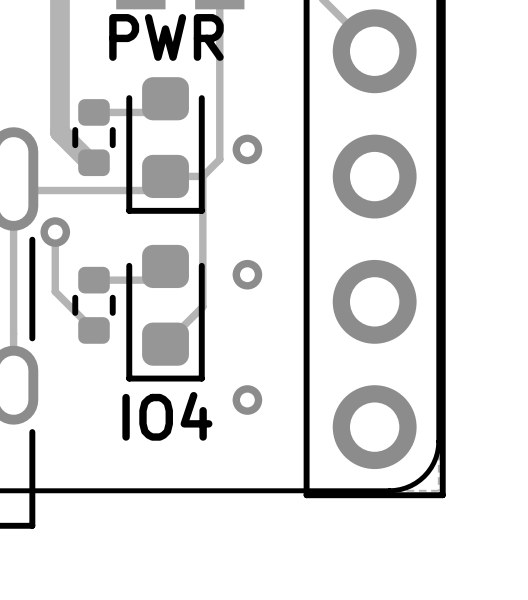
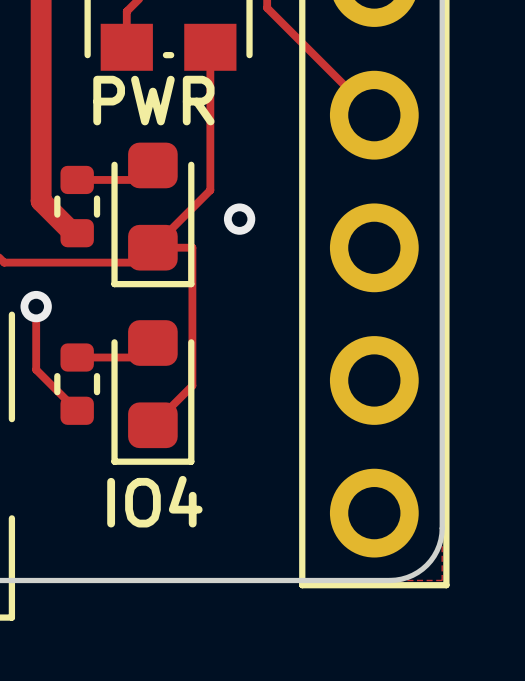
track: (219, 122) (219, 159) (202, 176) -> (210, 190) (152, 247)
via: (247, 274) -> none
via: (247, 400) -> none

